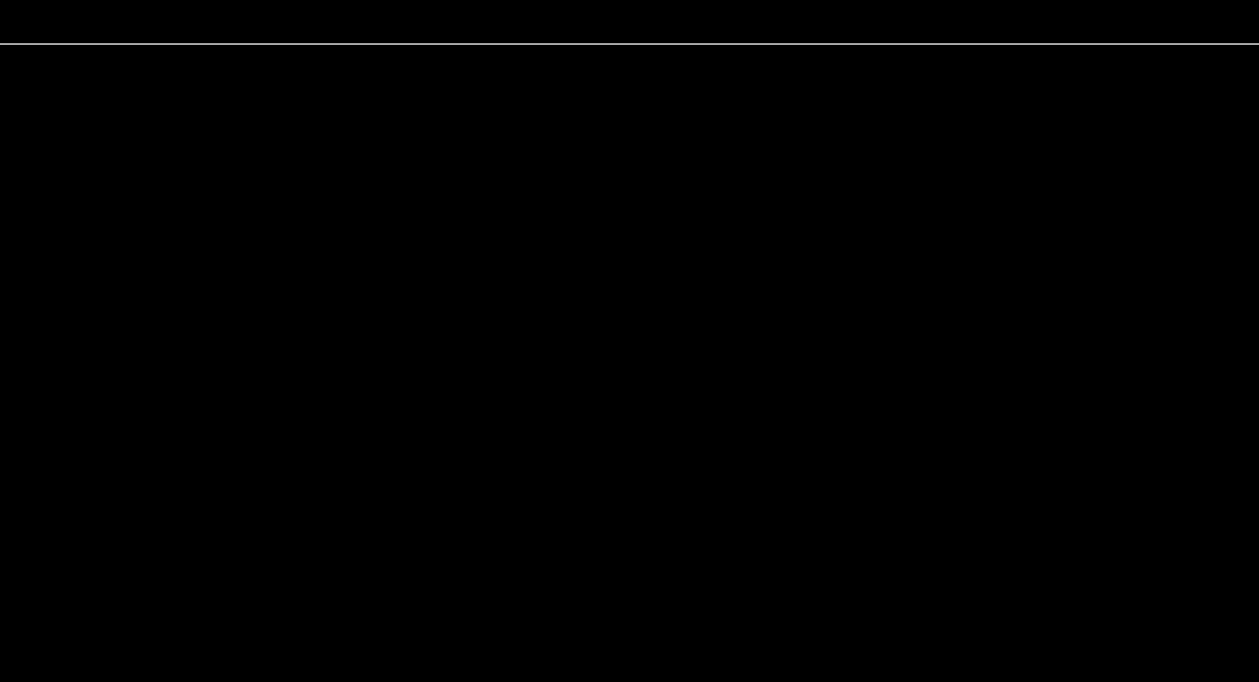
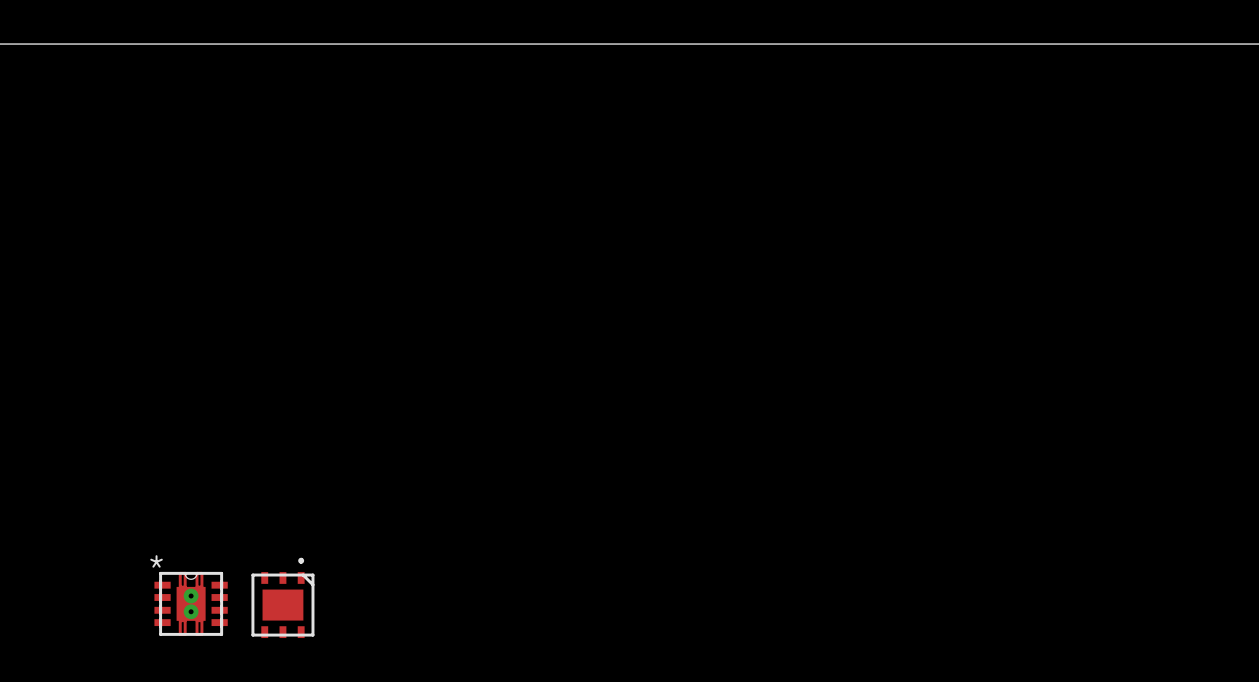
part: none -> (282, 597)
part: none -> (191, 603)

